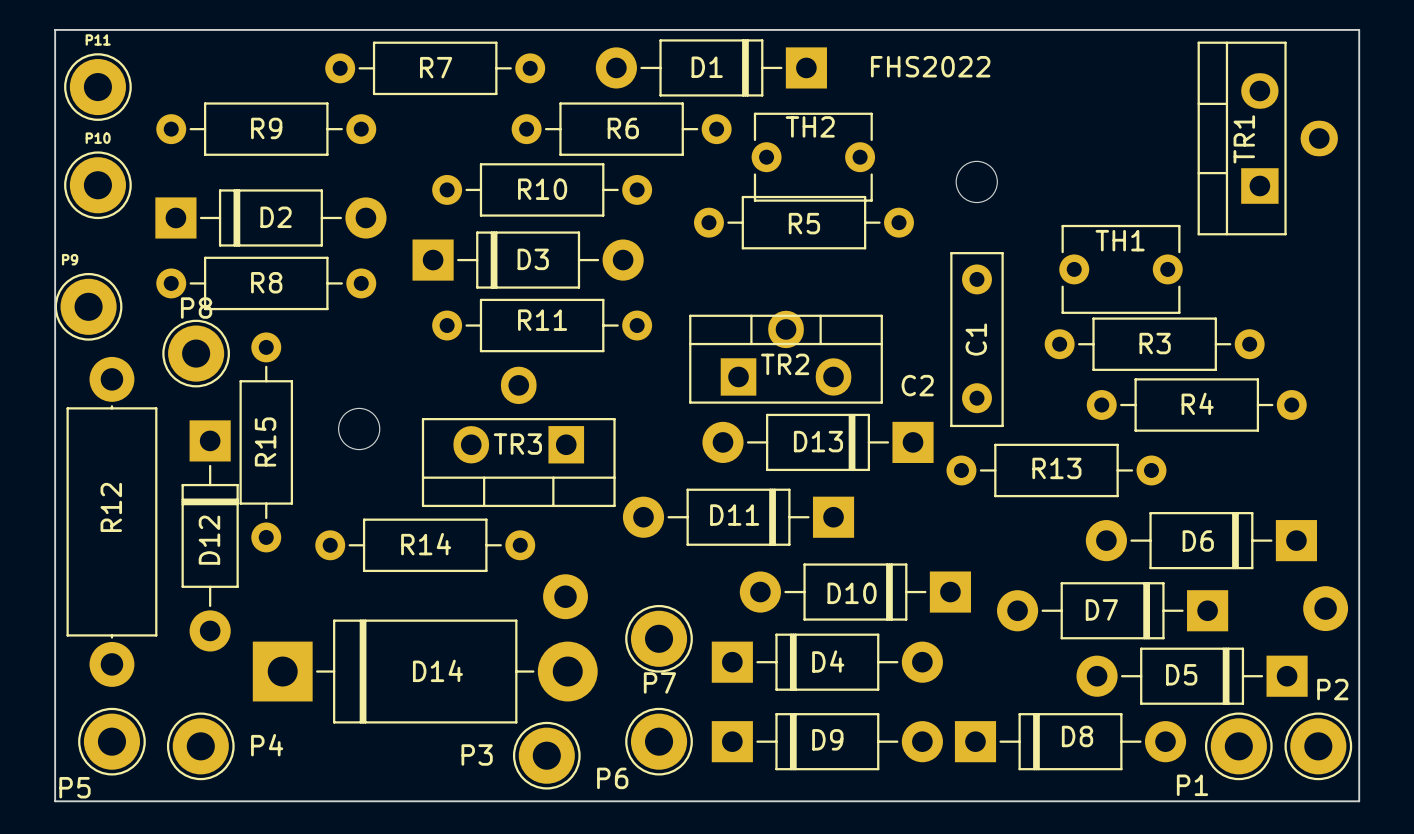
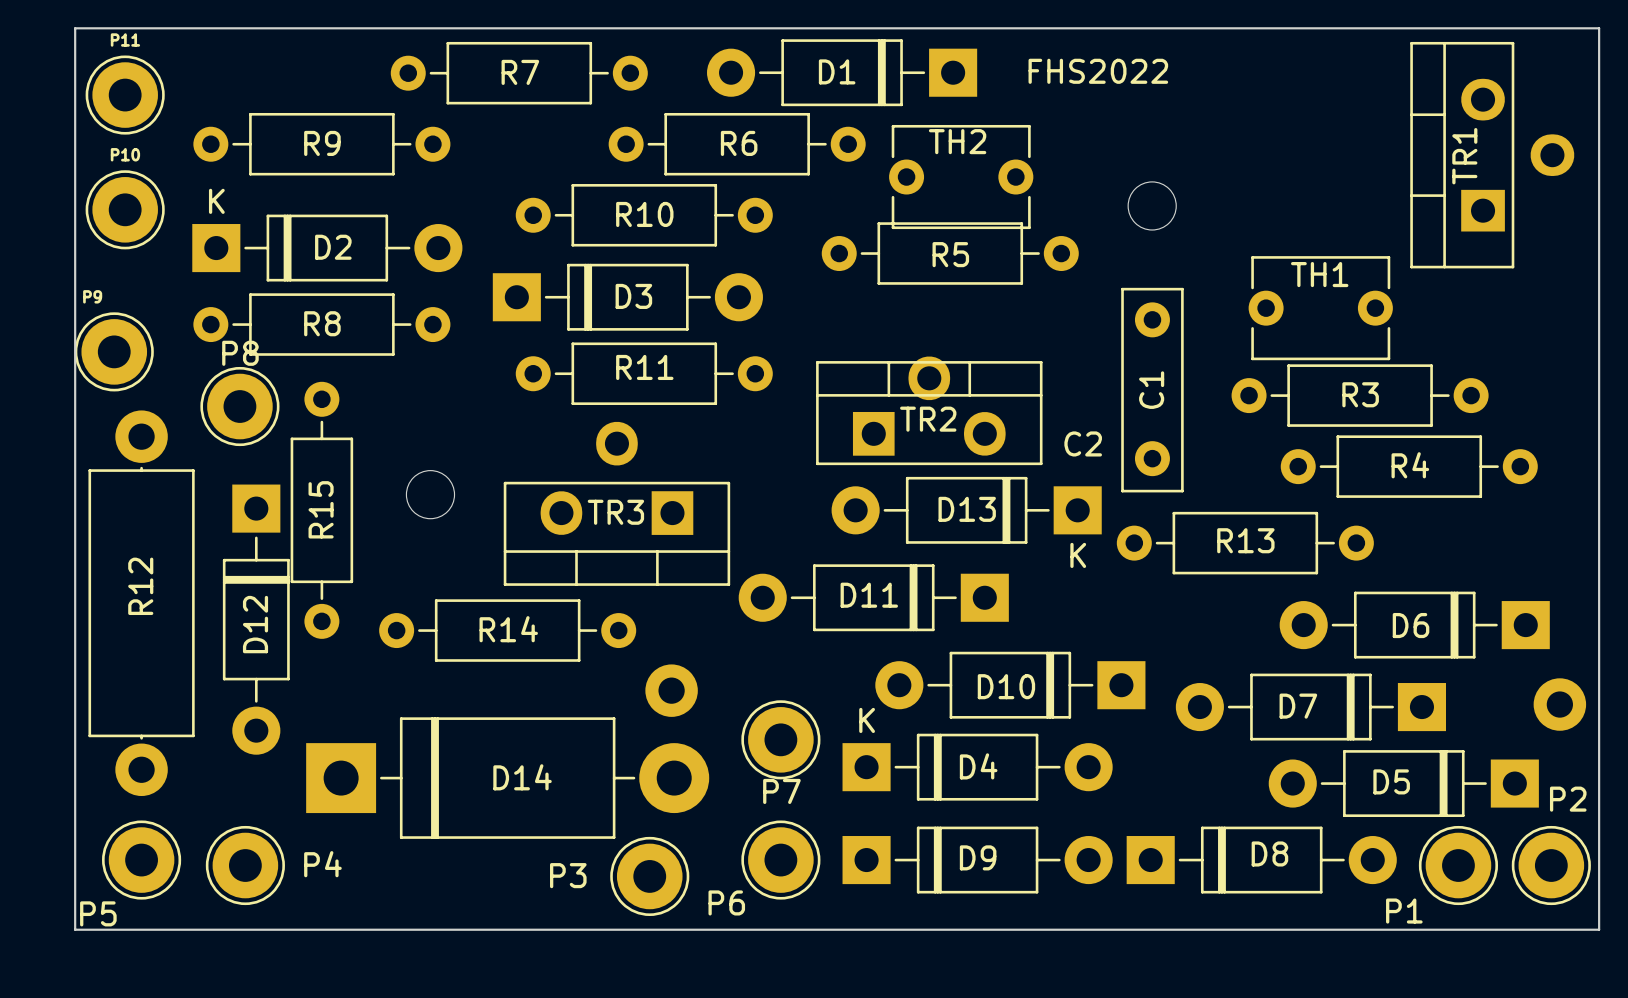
D2 text: none -> K (216, 201)
D13 text: none -> K (1078, 555)
D4 text: none -> K (867, 720)

